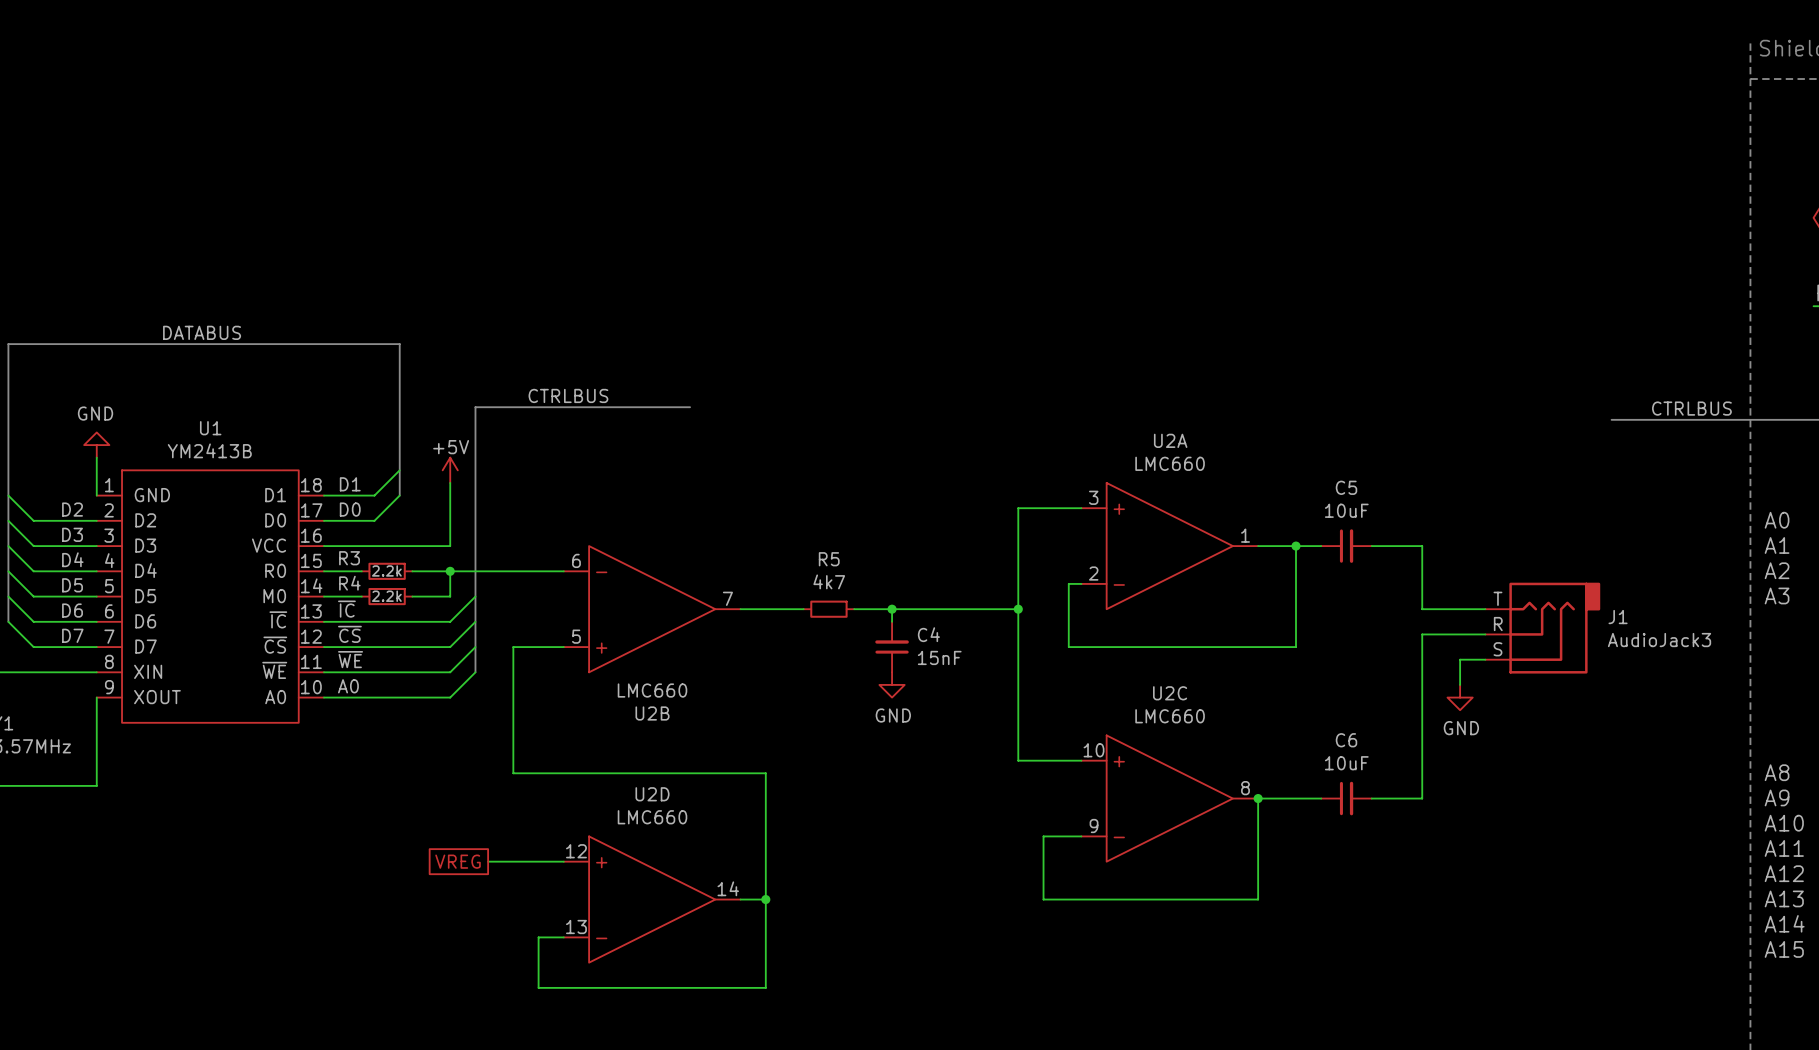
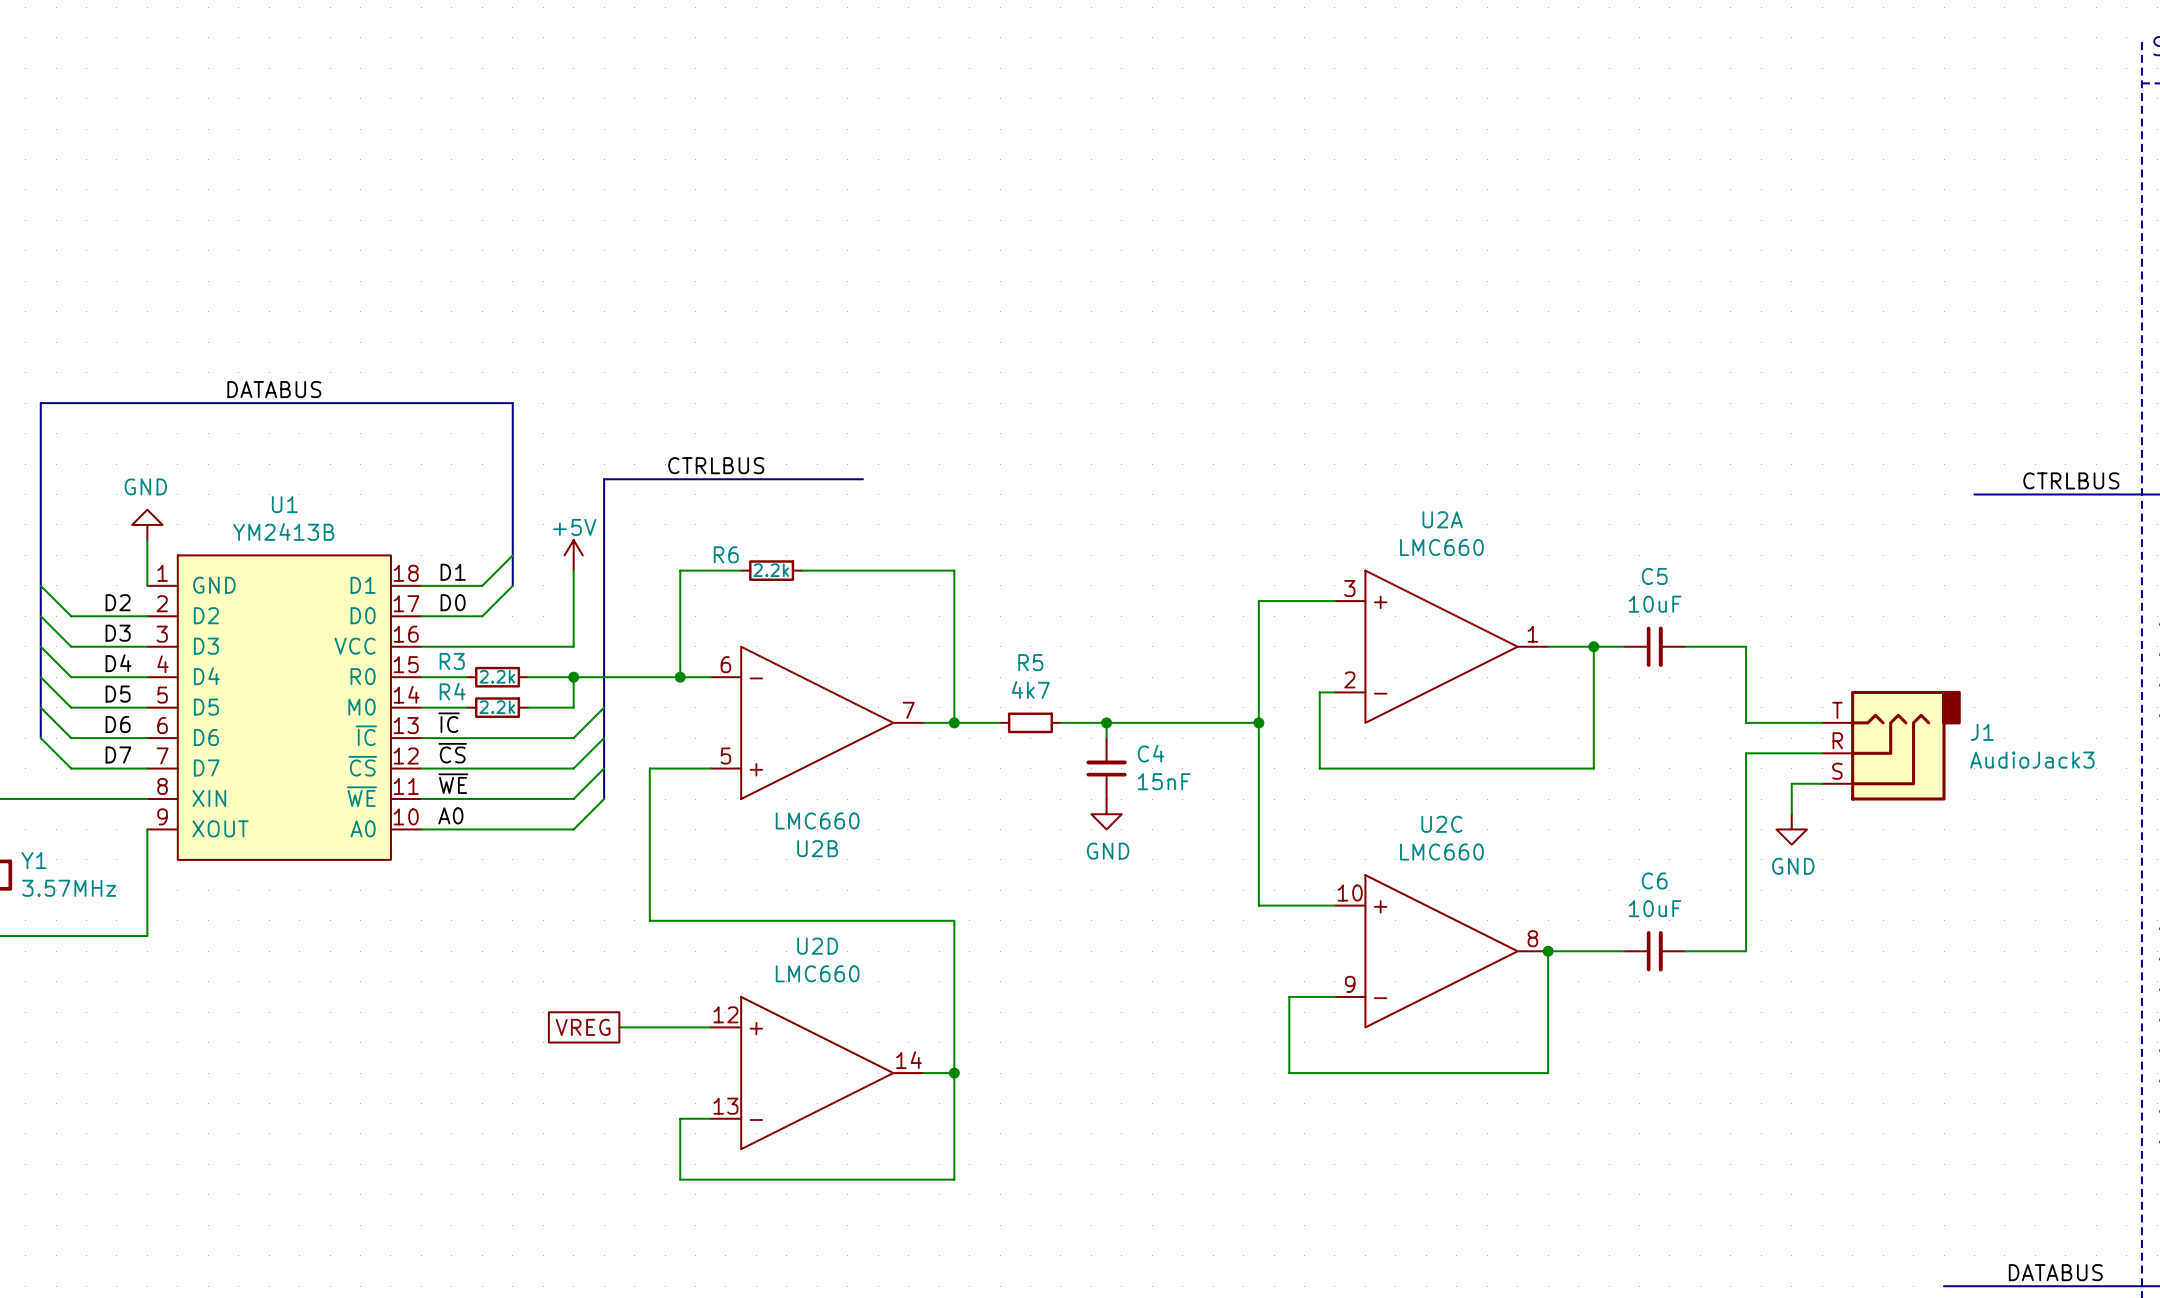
wire: none -> (741, 570) (680, 570) (680, 677)
R6: none -> 2.2k (771, 570)
wire: none -> (802, 570) (954, 570) (954, 722)
junction: none -> (680, 677)
junction: none -> (954, 722)

